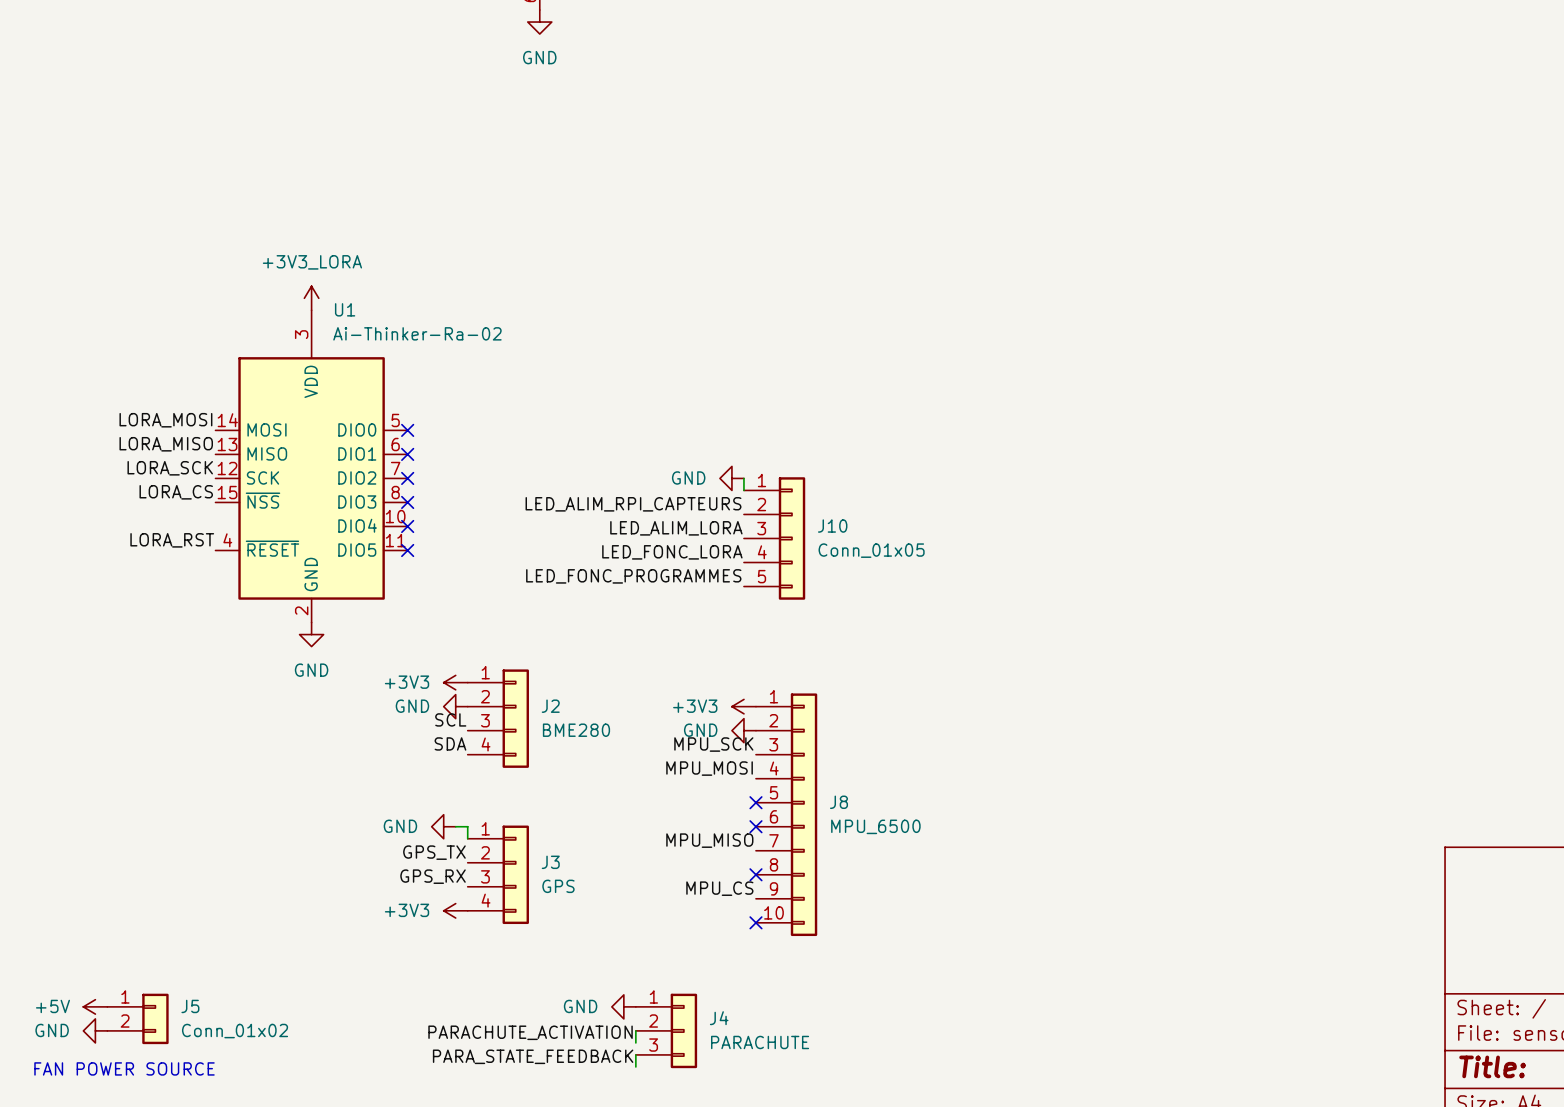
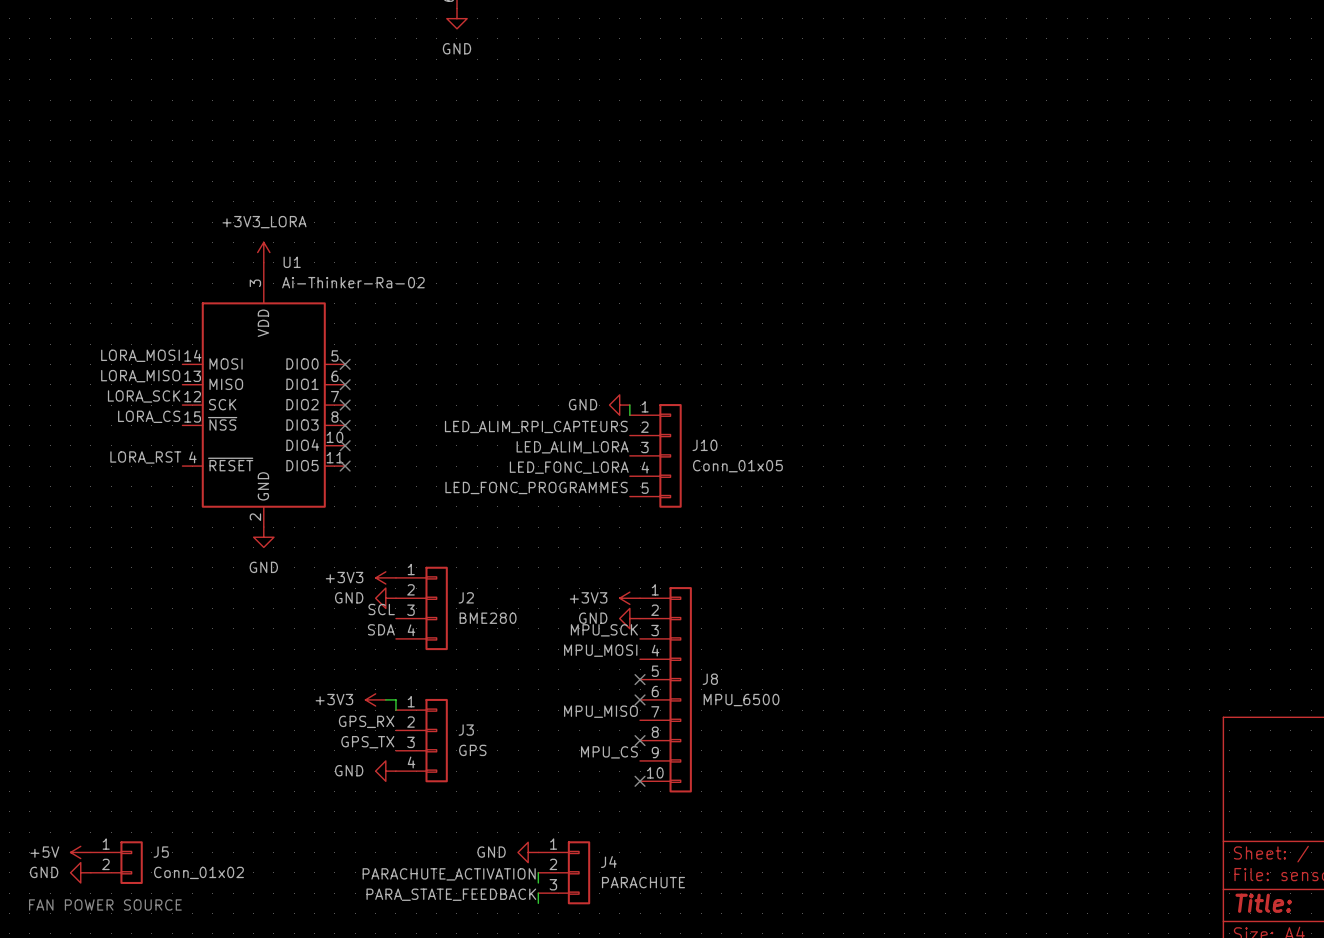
power symbol: GND (443, 826) -> +3V3 (375, 699)
label: GPS_TX (434, 852) -> GPS_RX (366, 721)
label: GPS_RX (433, 876) -> GPS_TX (367, 742)
power symbol: +3V3 (455, 910) -> GND (385, 771)

